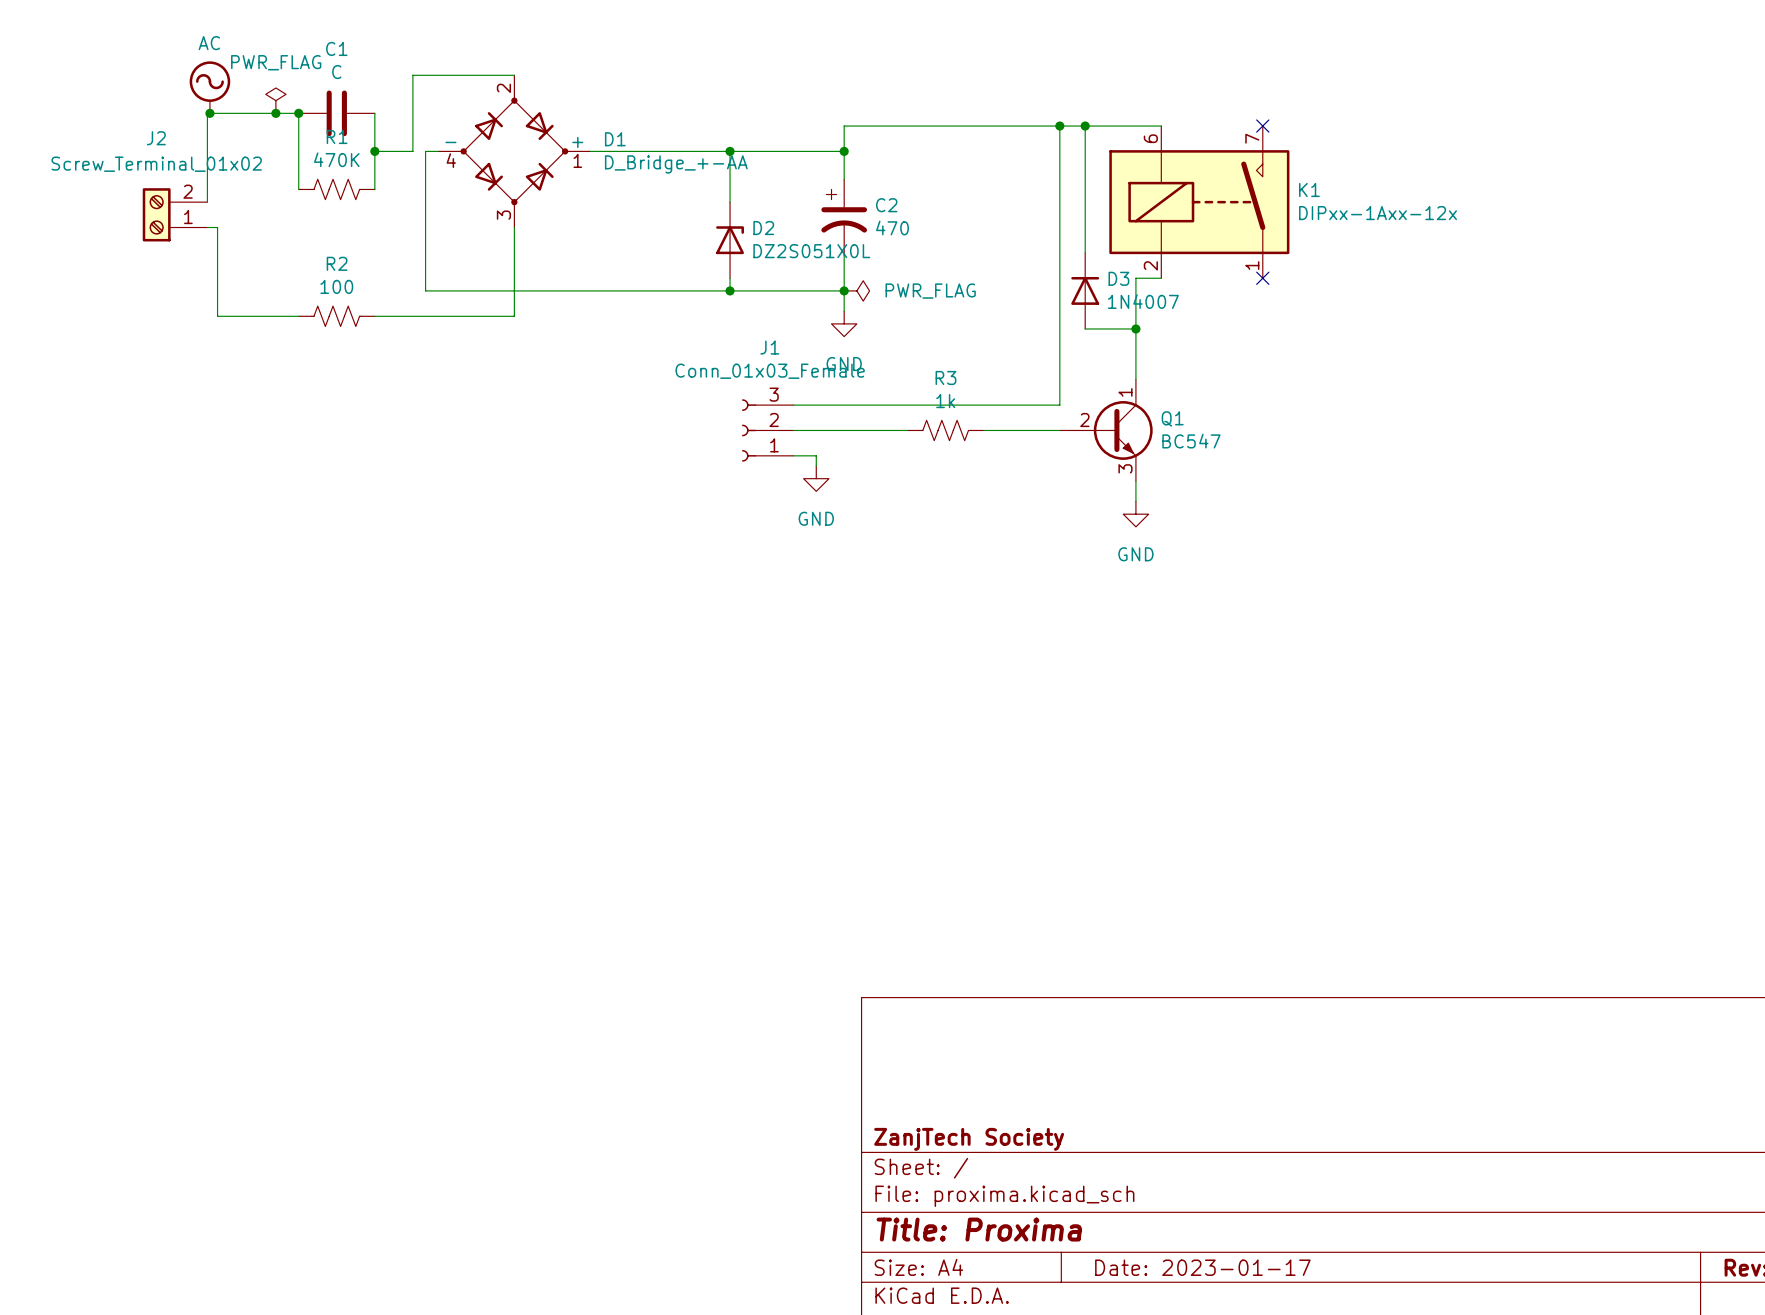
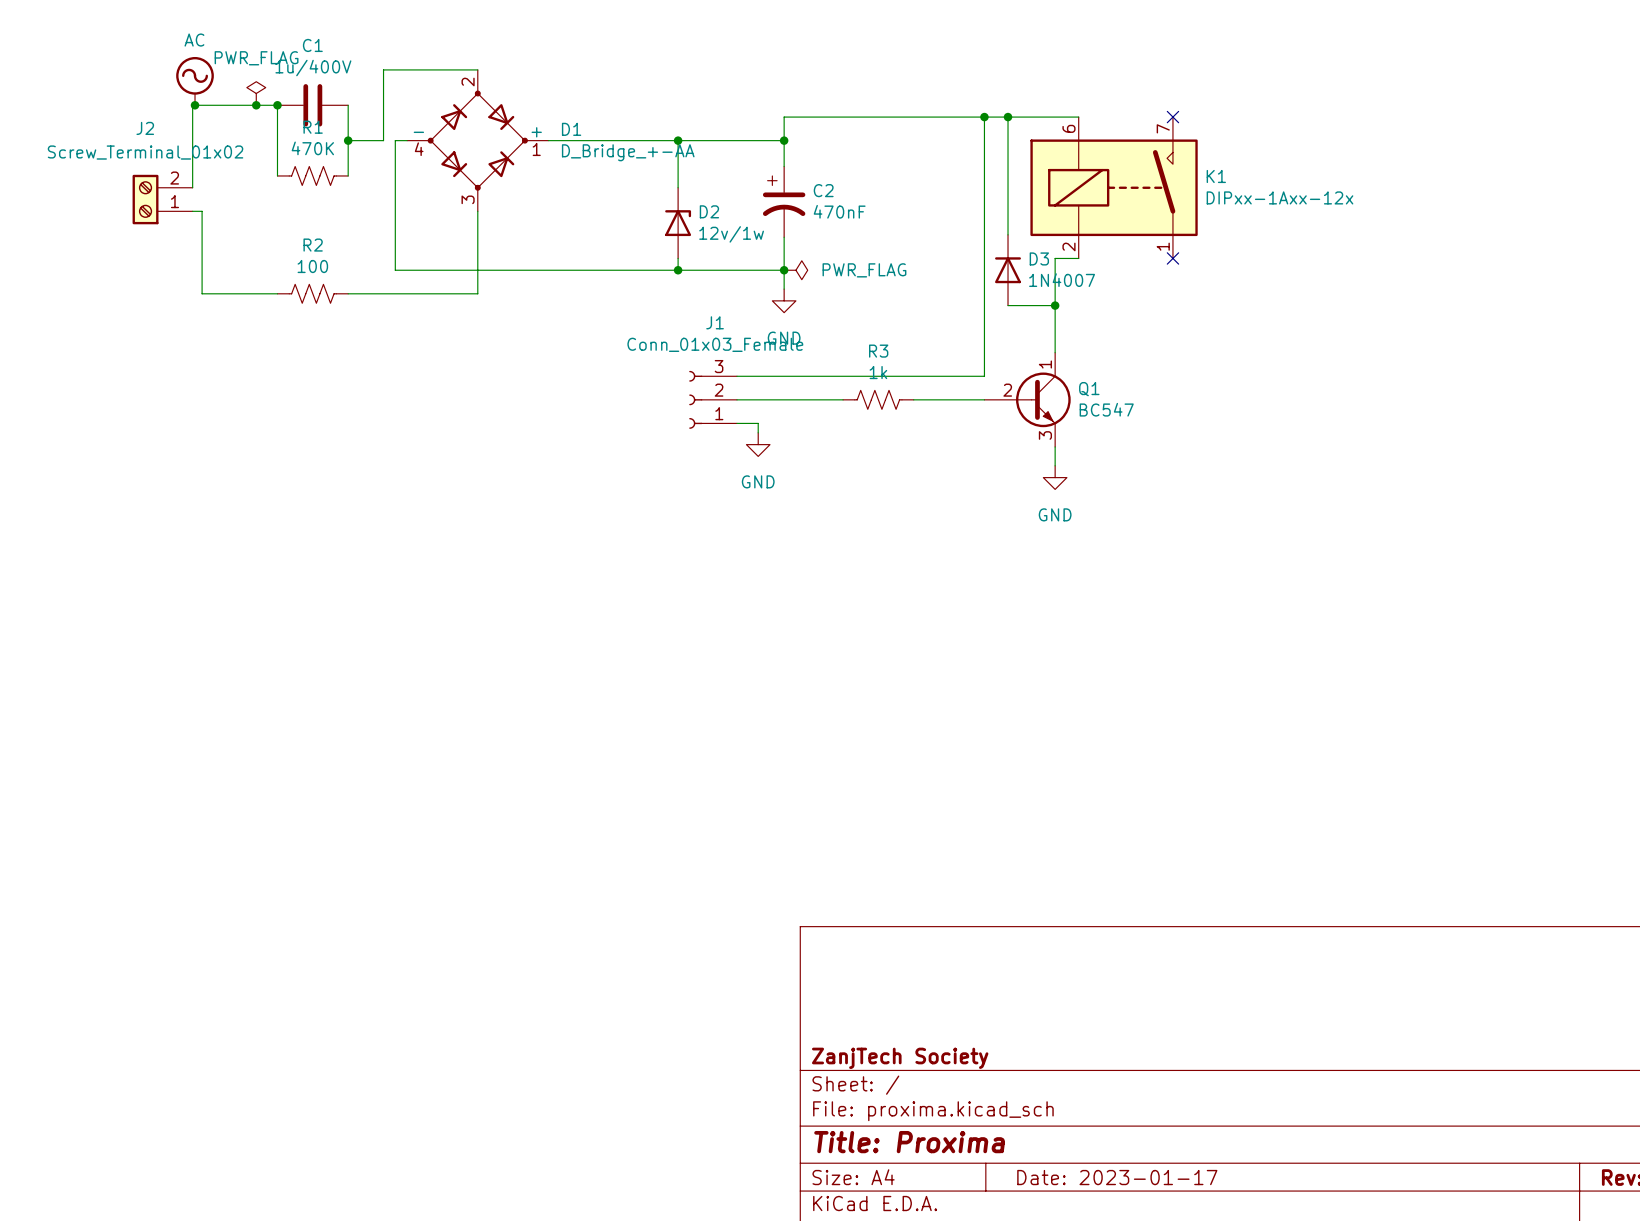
C1 value: C (336, 72) -> 1u/400V (313, 68)
C2 value: 470 (892, 228) -> 470nF (839, 211)
D2 value: DZ2S051X0L (811, 251) -> 12v/1w (731, 234)

